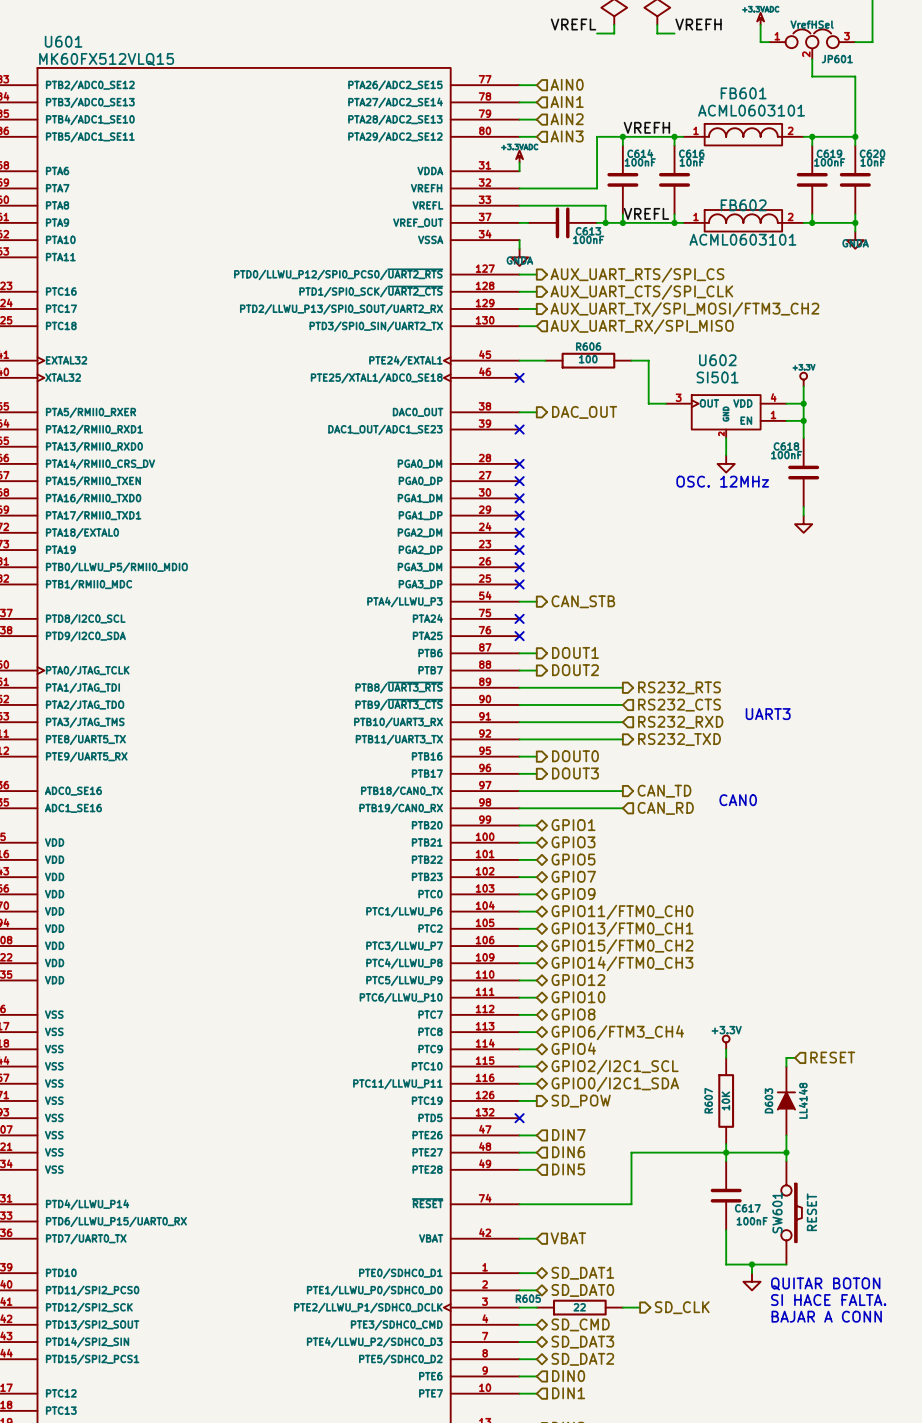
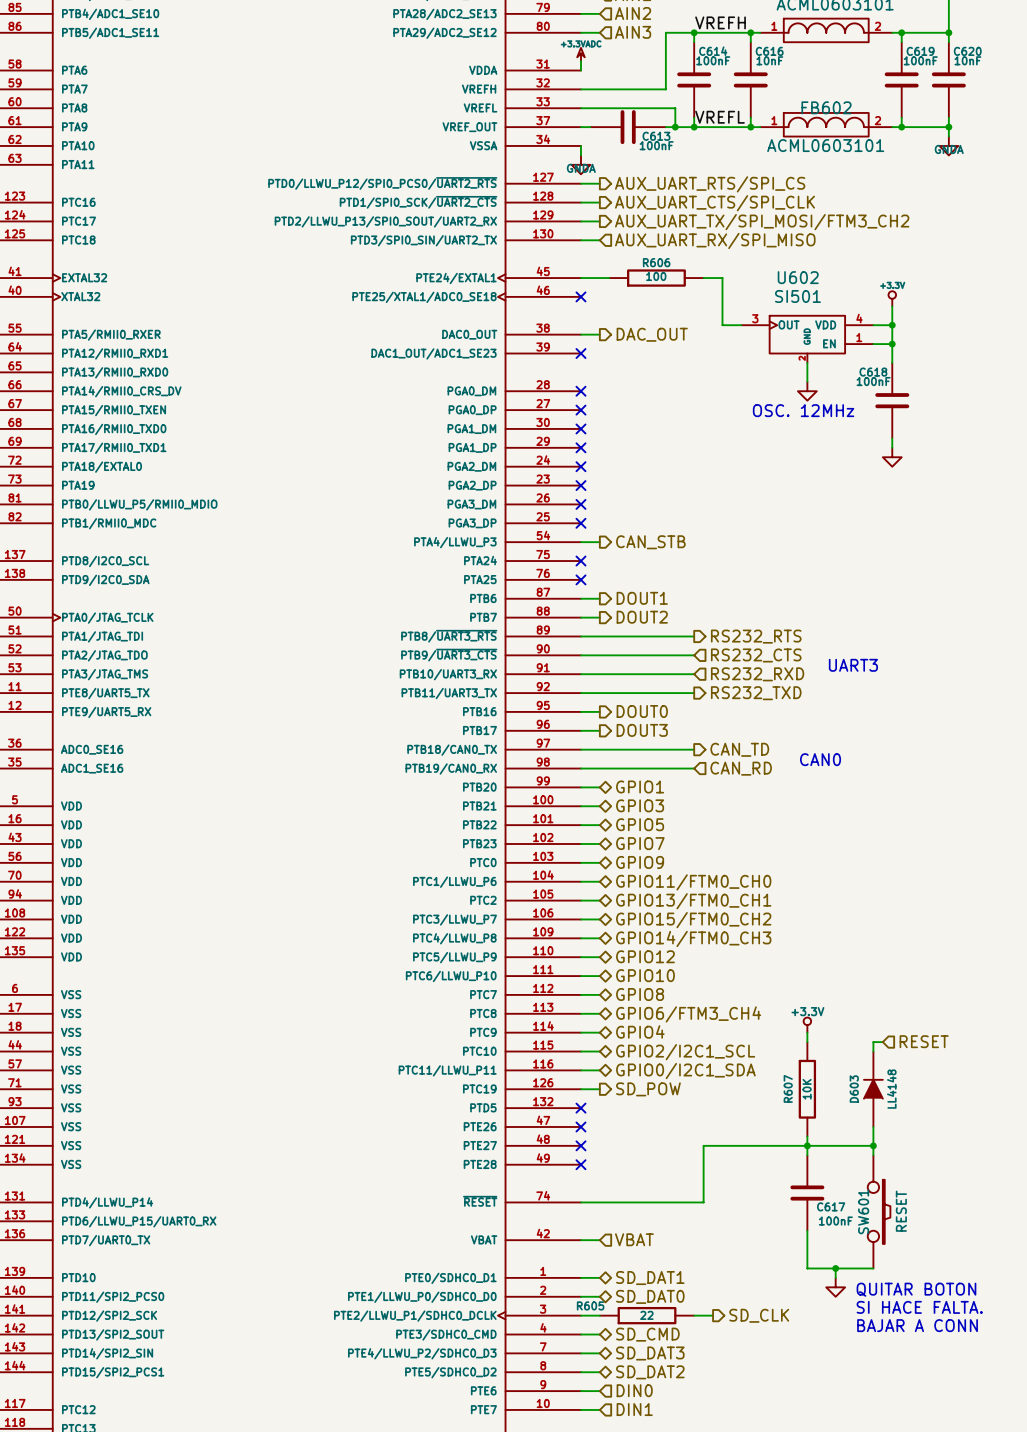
wire: (519, 1135) (536, 1135) -> none
no-connect mark: none -> (580, 1126)
hierarchical label: DIN7 (568, 1135) -> none
wire: (519, 1152) (536, 1152) -> none
no-connect mark: none -> (580, 1145)
hierarchical label: DIN6 (568, 1152) -> none
wire: (519, 1169) (536, 1169) -> none
no-connect mark: none -> (580, 1164)
hierarchical label: DIN5 (568, 1169) -> none

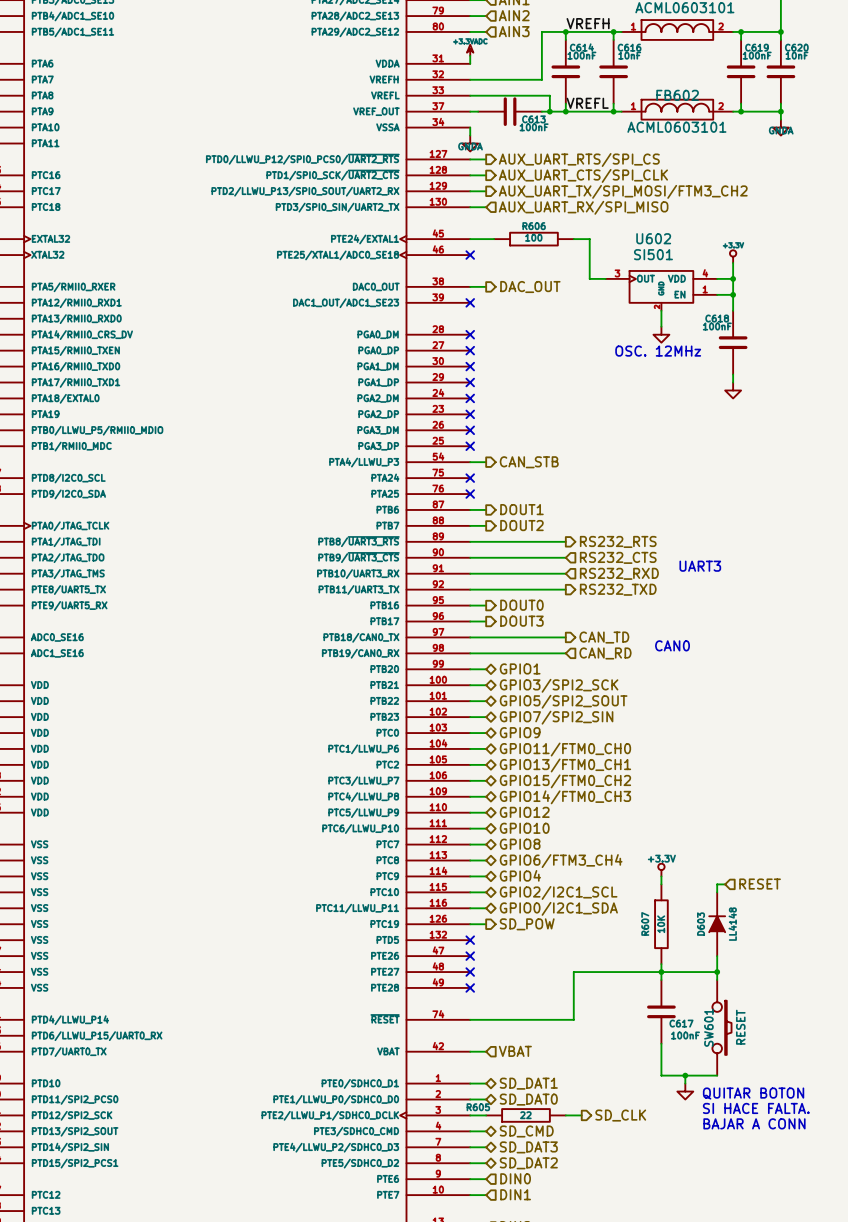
hierarchical label: GPIO3 (640, 805) -> GPIO3/SPI2_SCK (559, 685)
hierarchical label: GPIO5 (640, 824) -> GPIO5/SPI2_SOUT (563, 701)
hierarchical label: GPIO7 (640, 843) -> GPIO7/SPI2_SIN (556, 717)

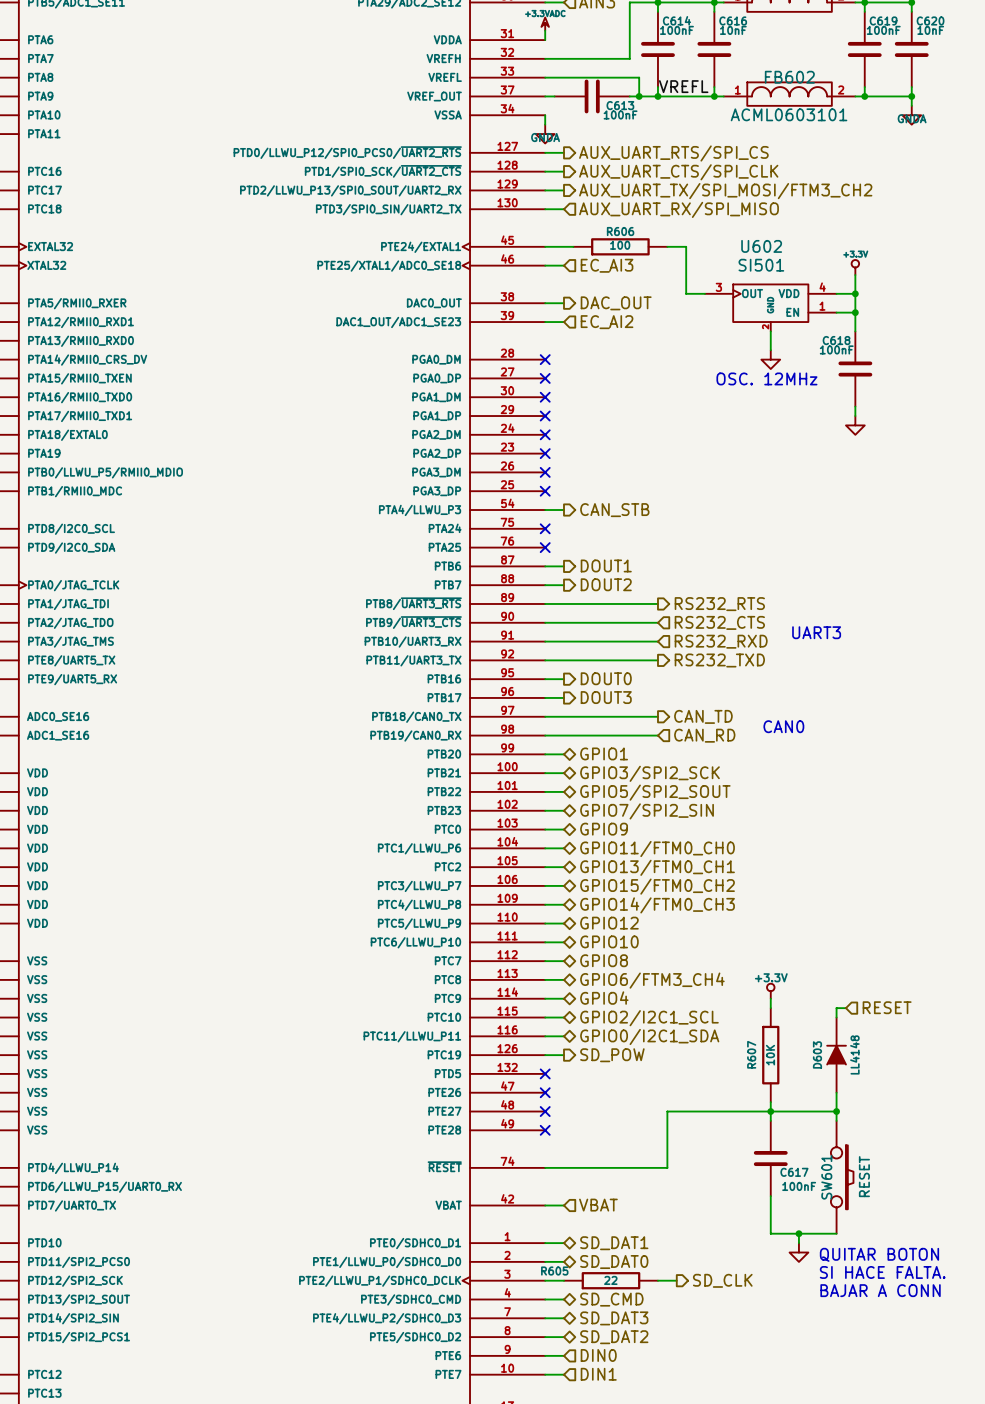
wire: none -> (545, 265) (563, 265)
no-connect mark: (470, 255) -> none
hierarchical label: none -> EC_AI3 (607, 265)
wire: none -> (545, 322) (563, 322)
no-connect mark: (470, 302) -> none
hierarchical label: none -> EC_AI2 (607, 322)

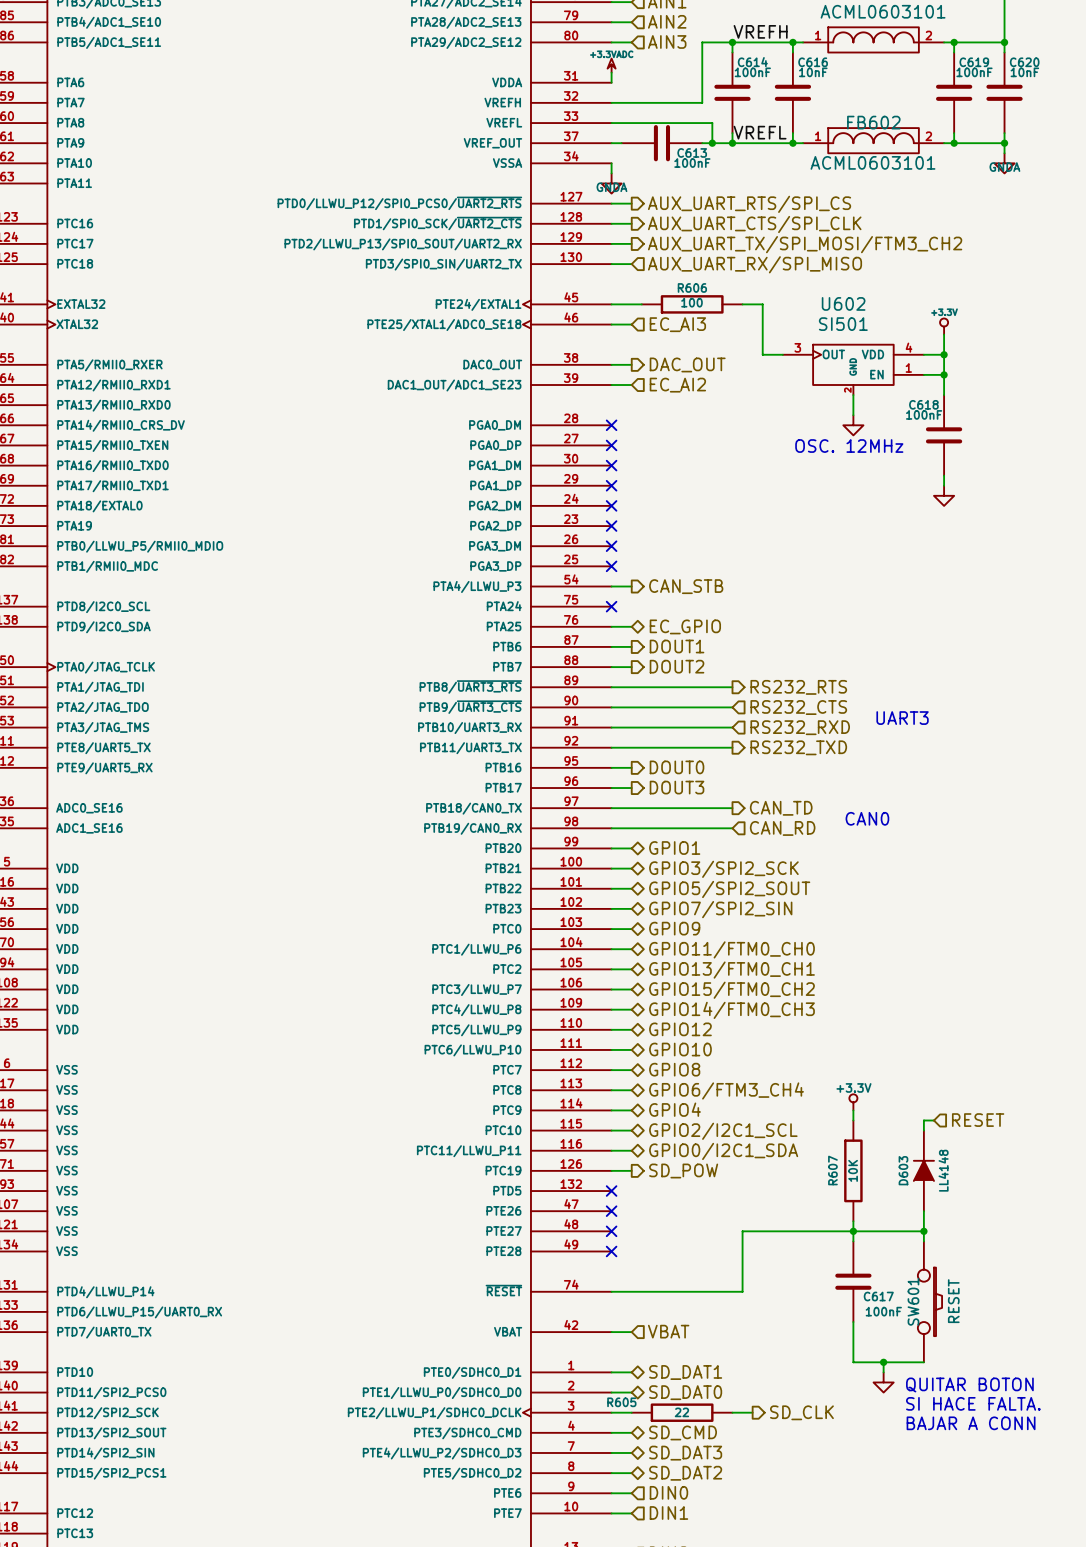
wire: none -> (611, 626) (631, 626)
no-connect mark: (545, 547) -> none
hierarchical label: none -> EC_GPIO (685, 626)

